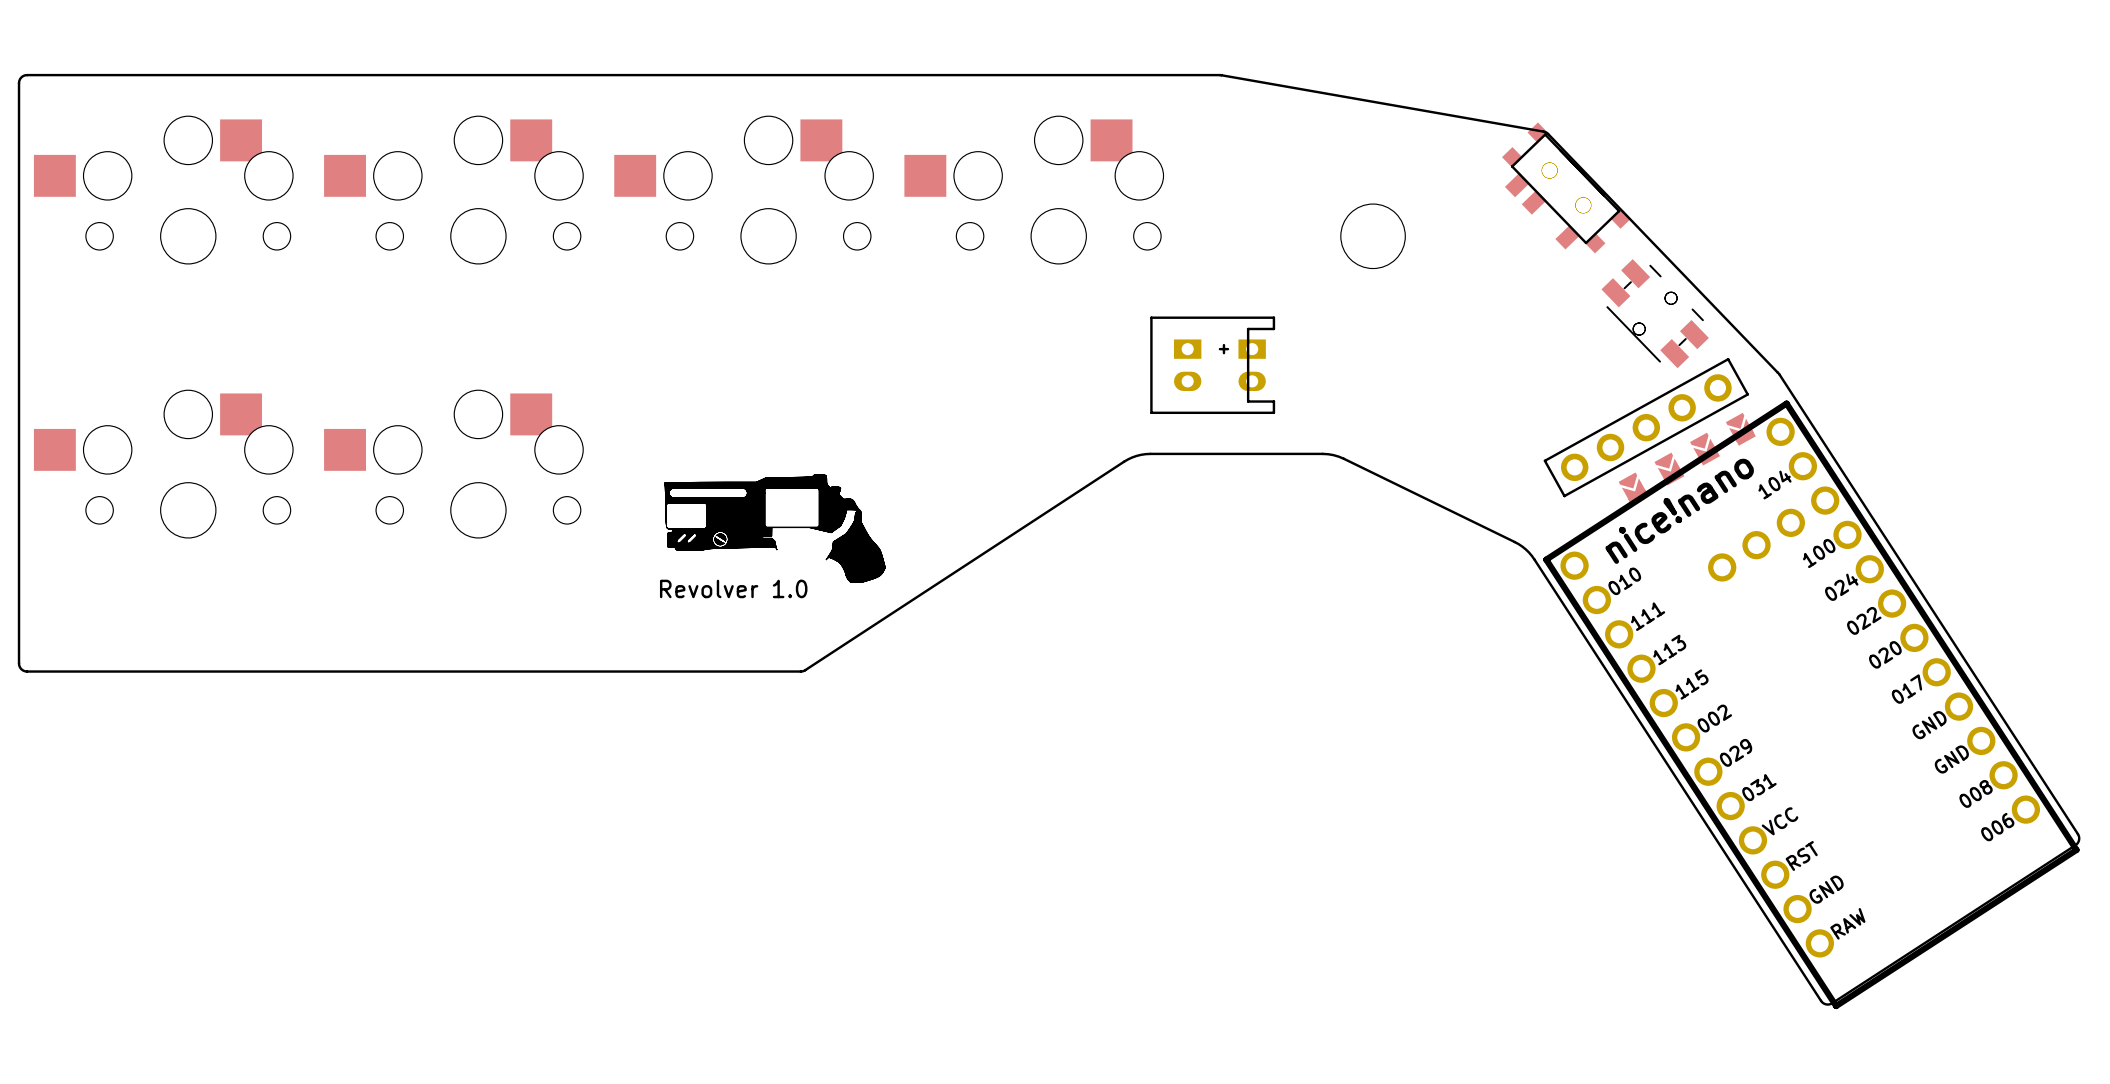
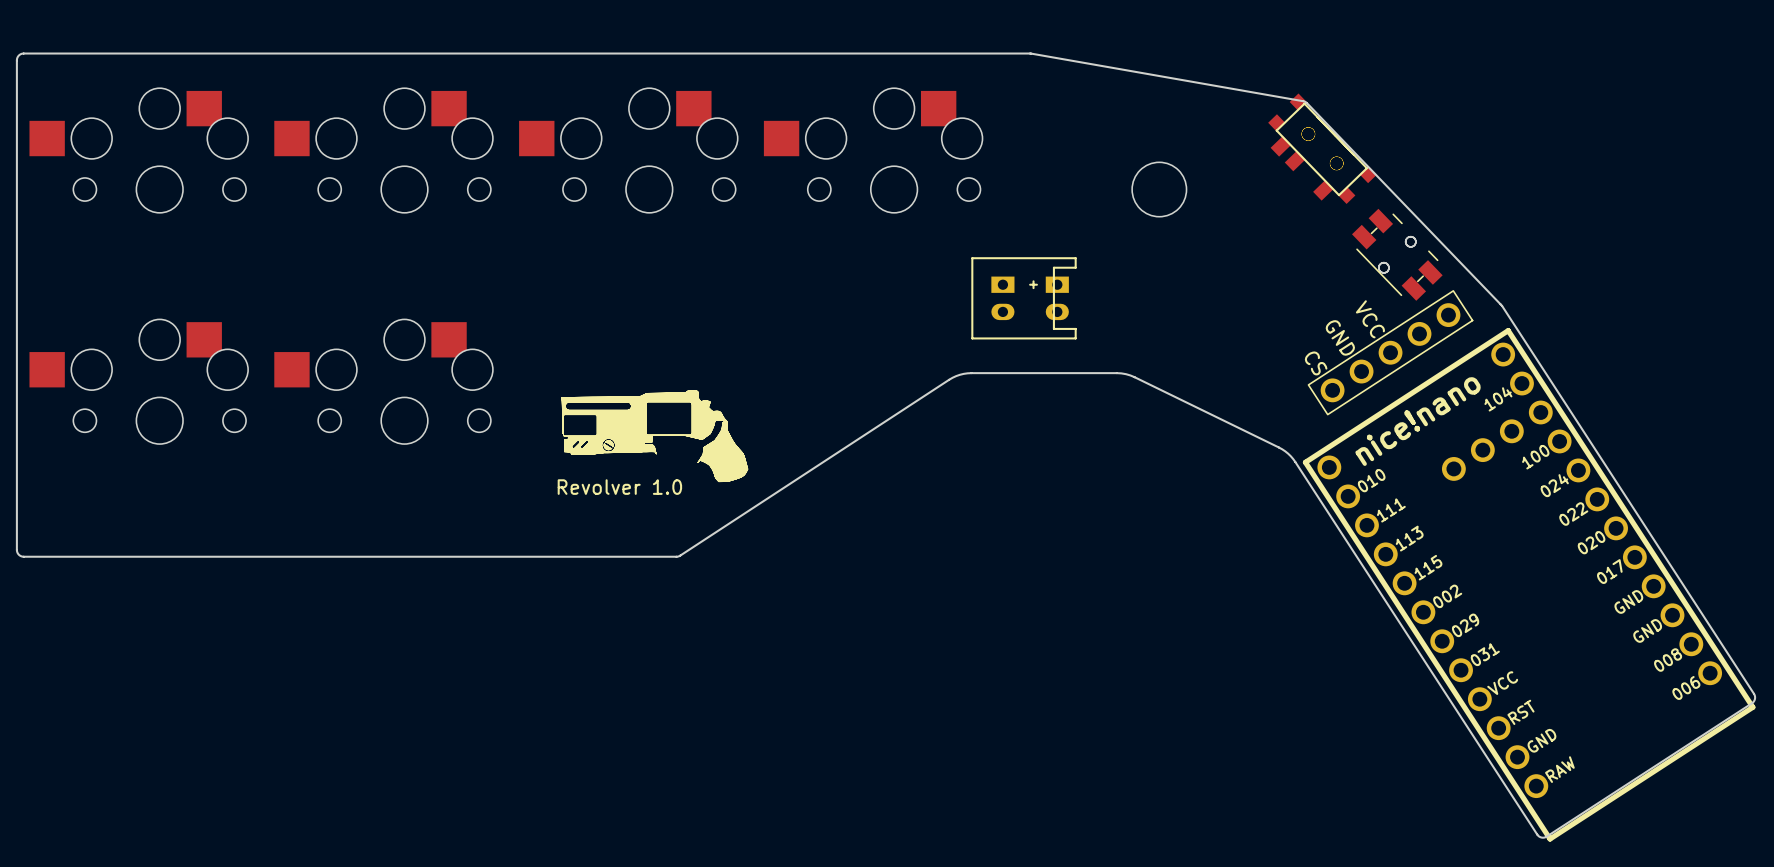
part footprint: [1543, 358, 1749, 498] -> [1307, 290, 1474, 416]
part: (1740, 429) -> none
part: (1705, 449) -> none
part: (1669, 469) -> none
part: (1633, 488) -> none

